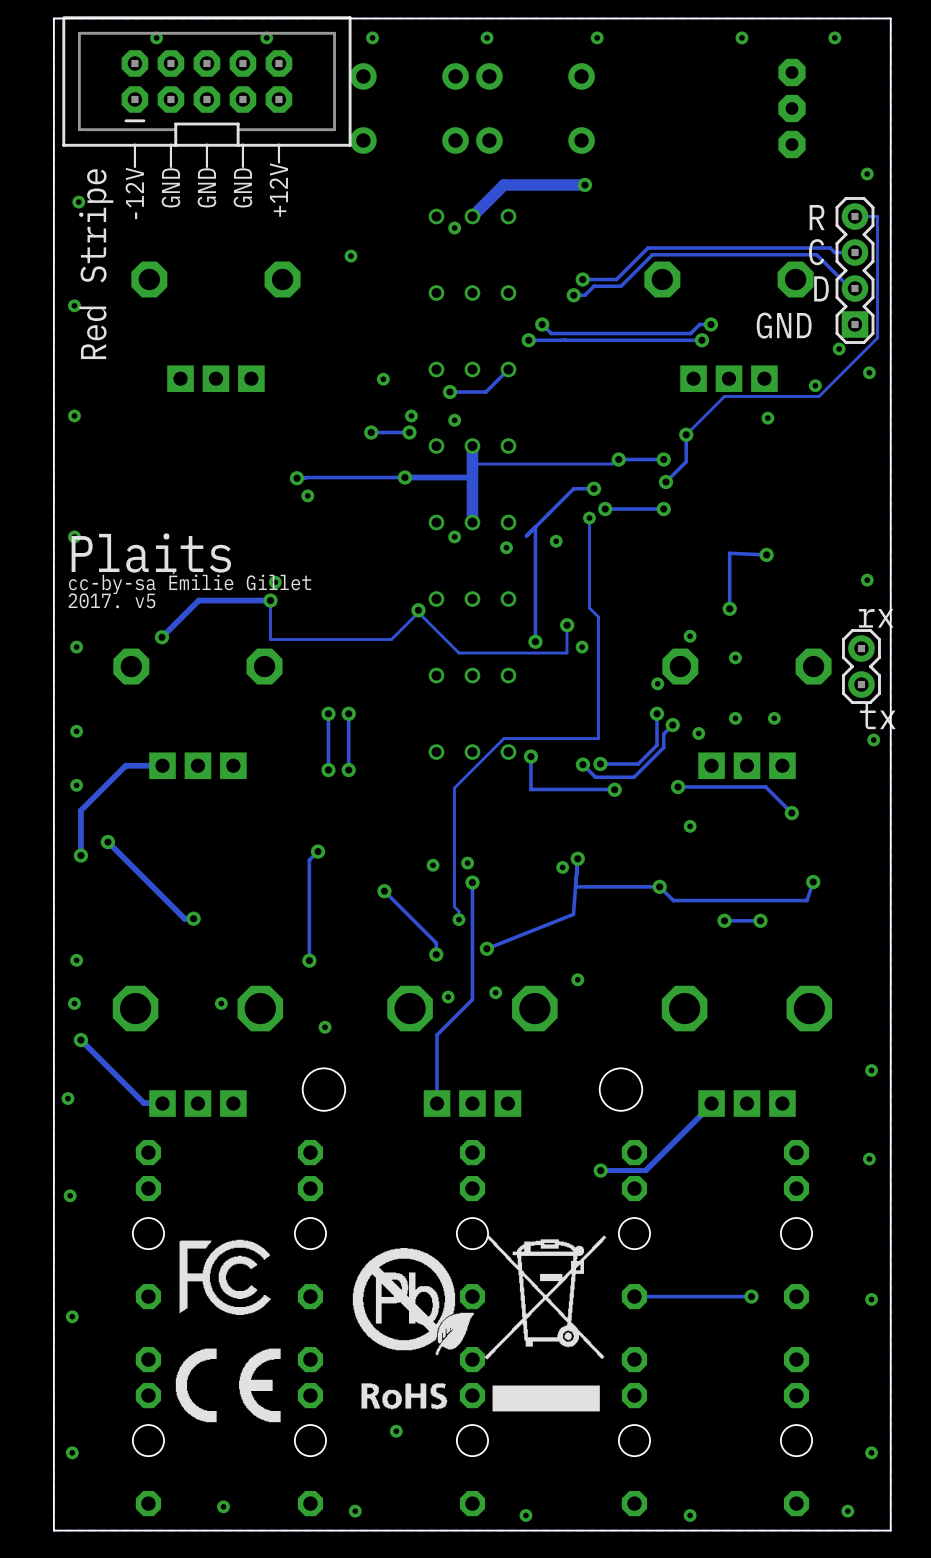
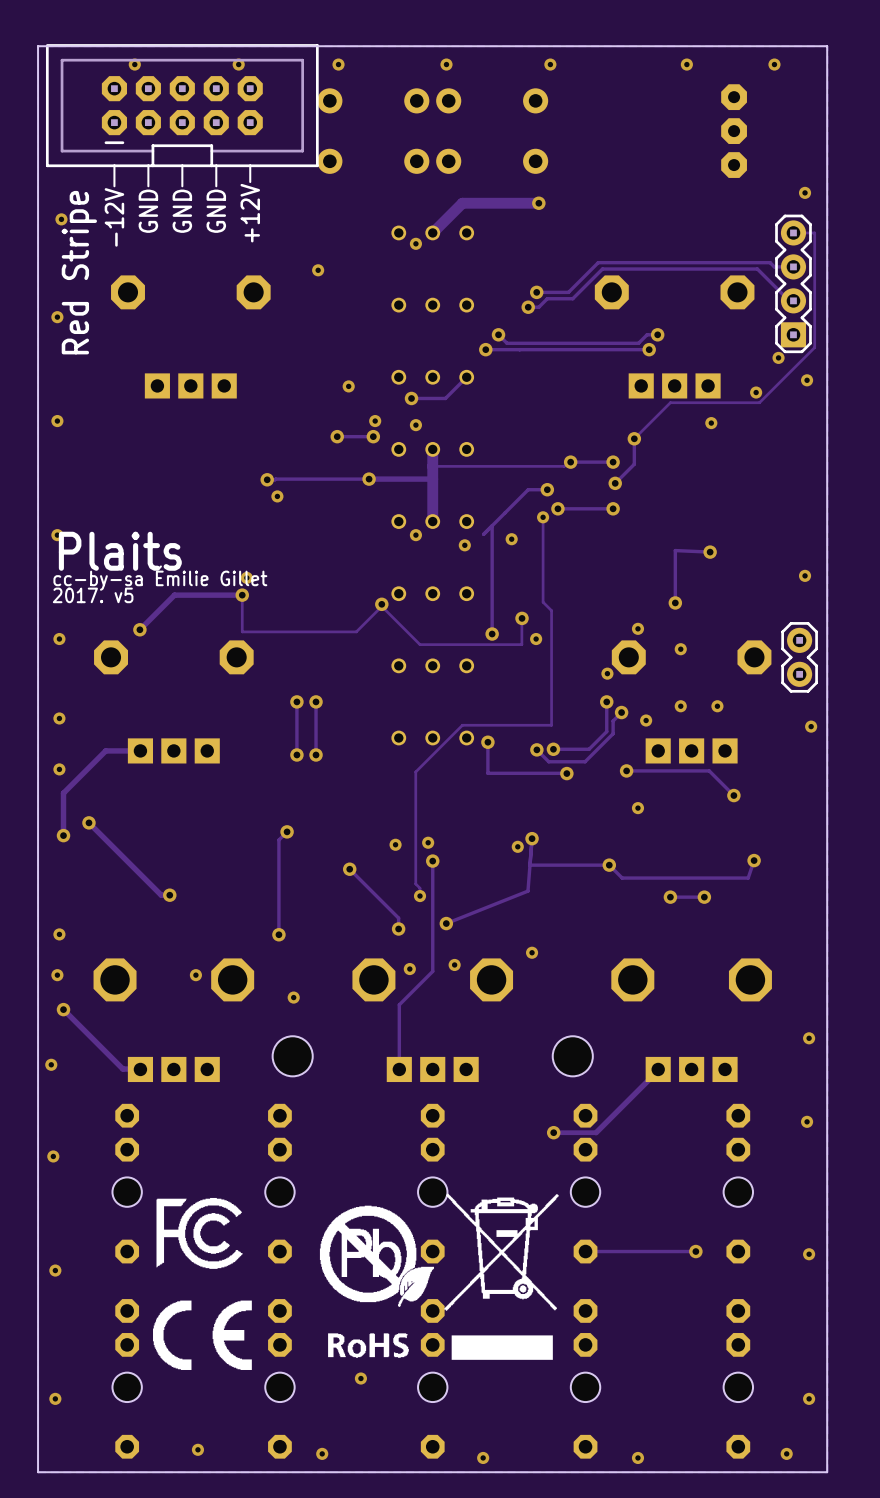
text: R (817, 217) -> none
text: C (816, 252) -> none
text: D (821, 288) -> none
text: GND (784, 325) -> none
text: rx (876, 618) -> none
text: tx (877, 716) -> none

